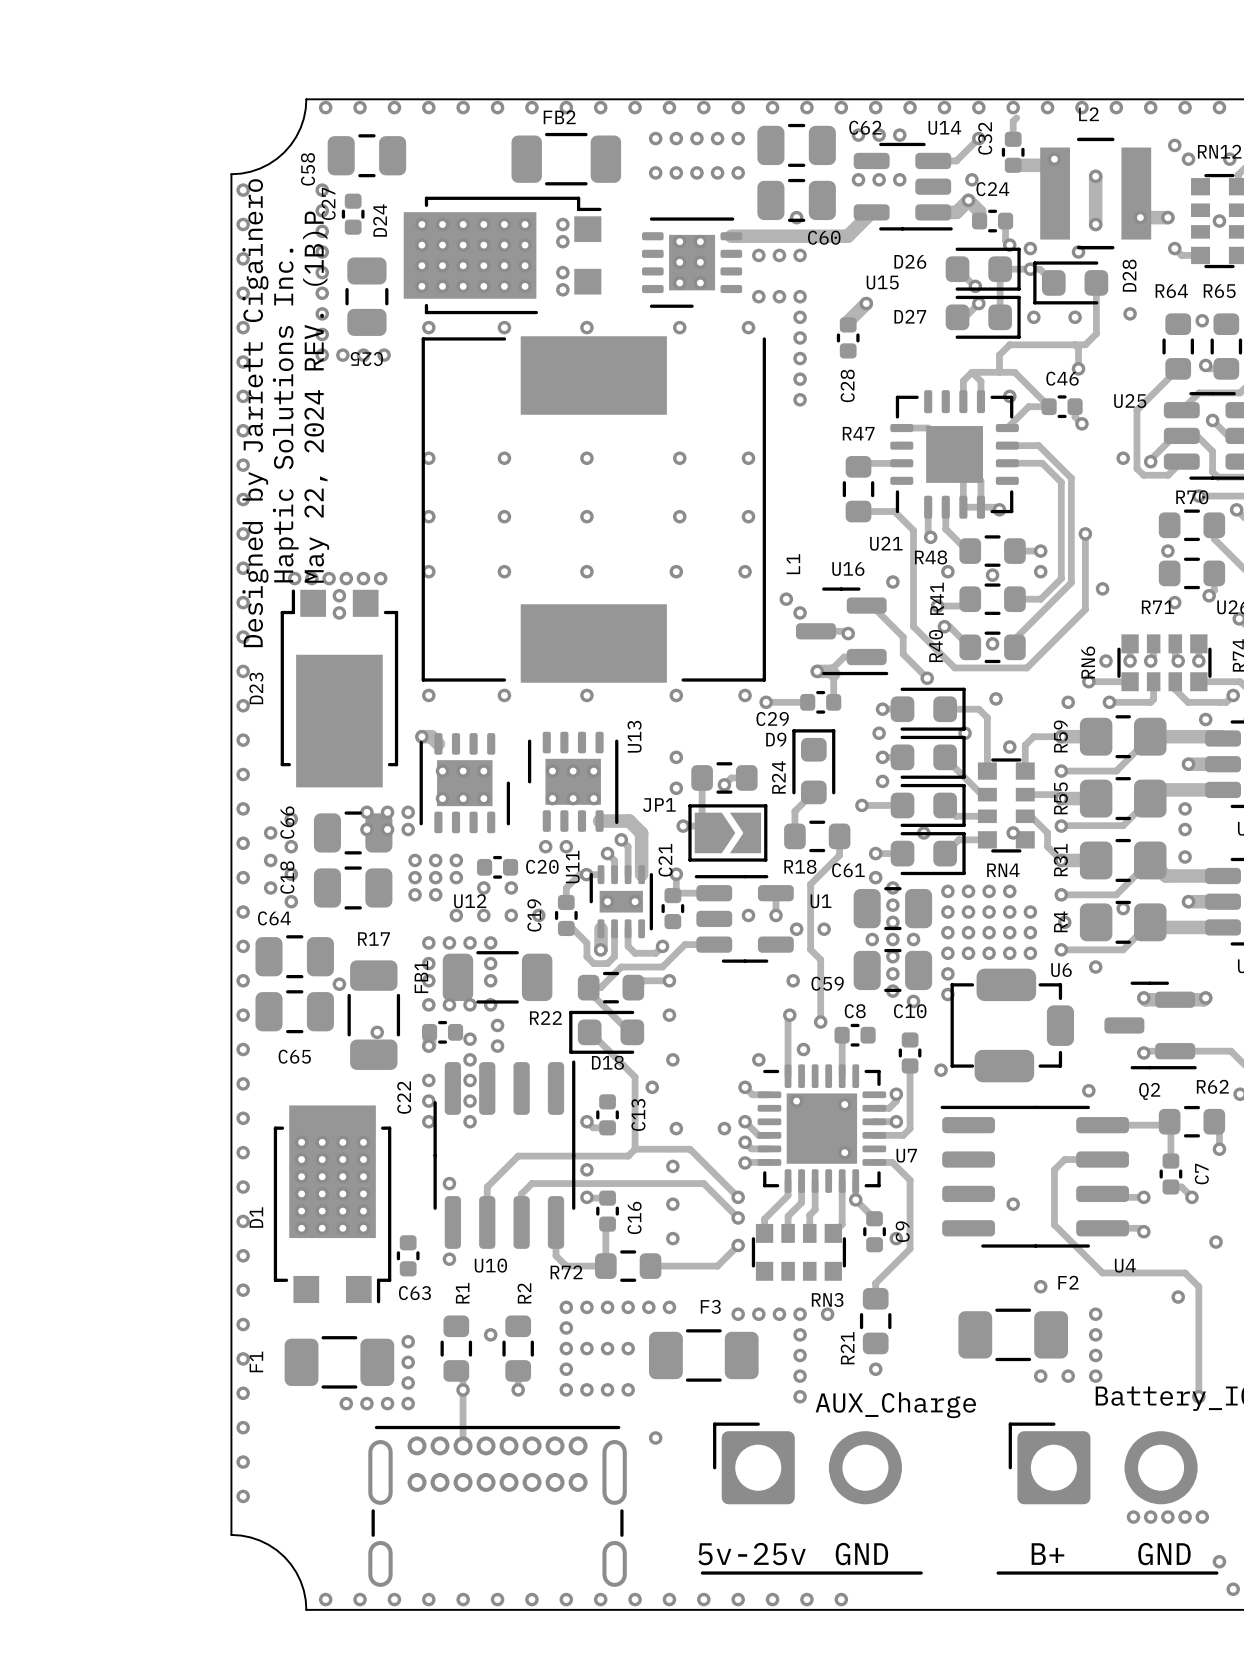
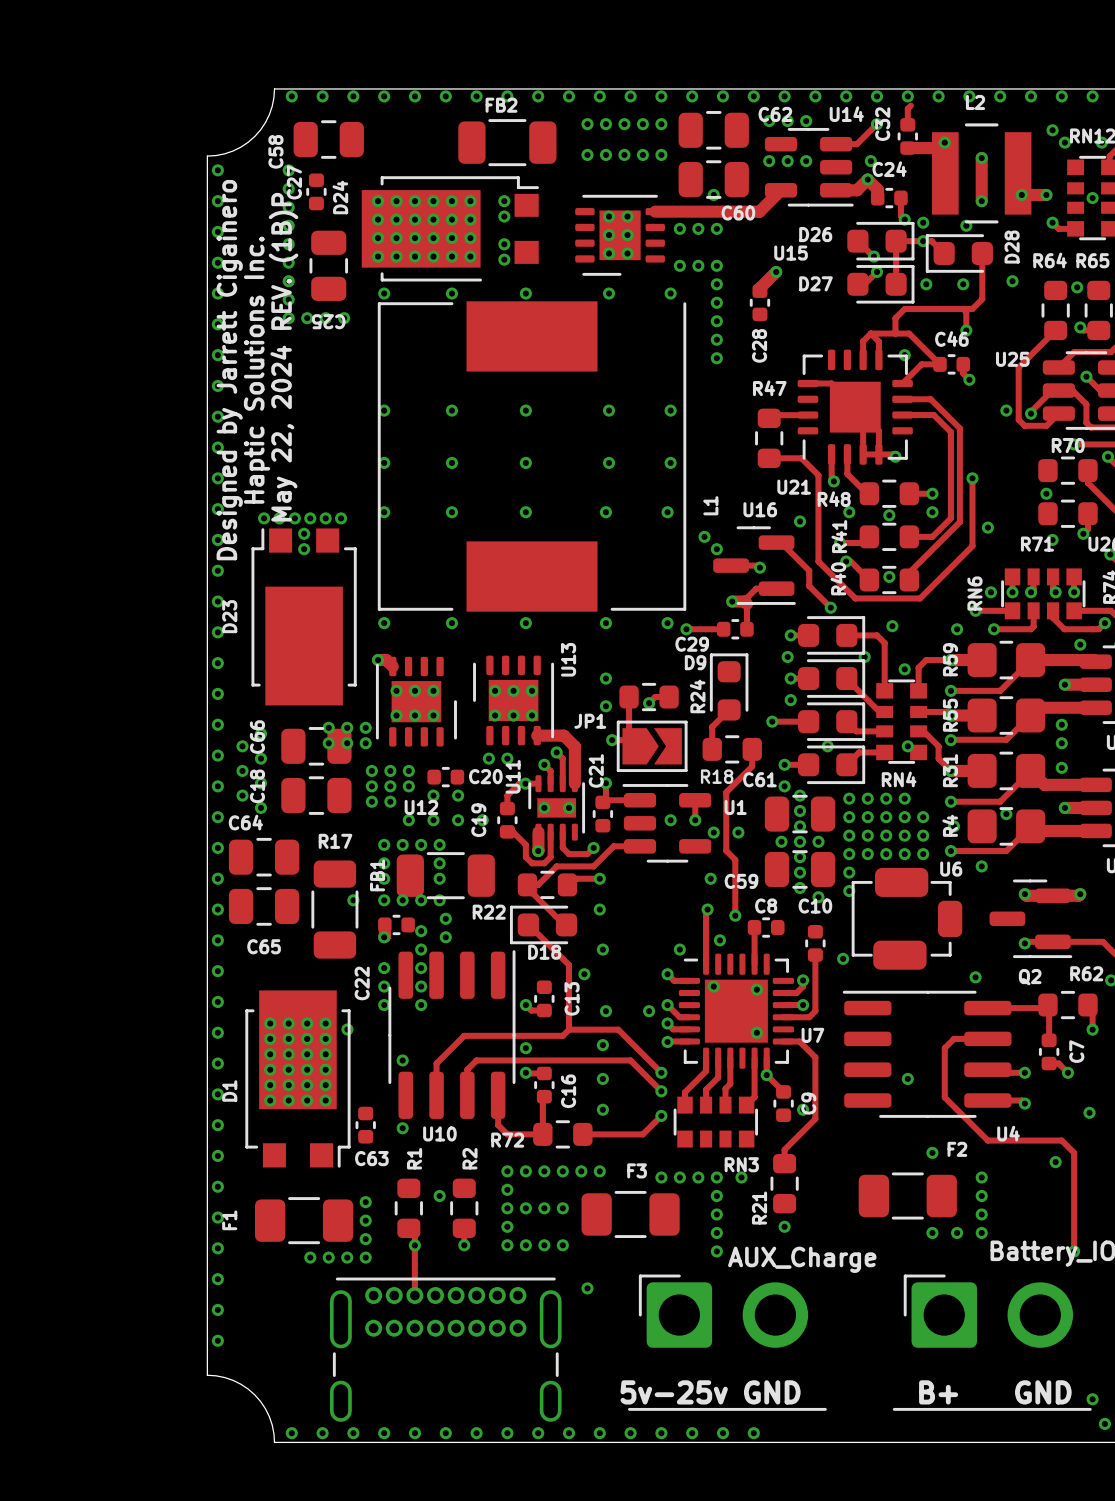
via: (339, 984) -> none
via: none -> (353, 900)
via: (377, 1032) -> none
via: none -> (347, 1029)
via: (1133, 1517) -> none
via: (1150, 1517) -> none
via: (1167, 1517) -> none
via: (1185, 1517) -> none
via: (1202, 1517) -> none

